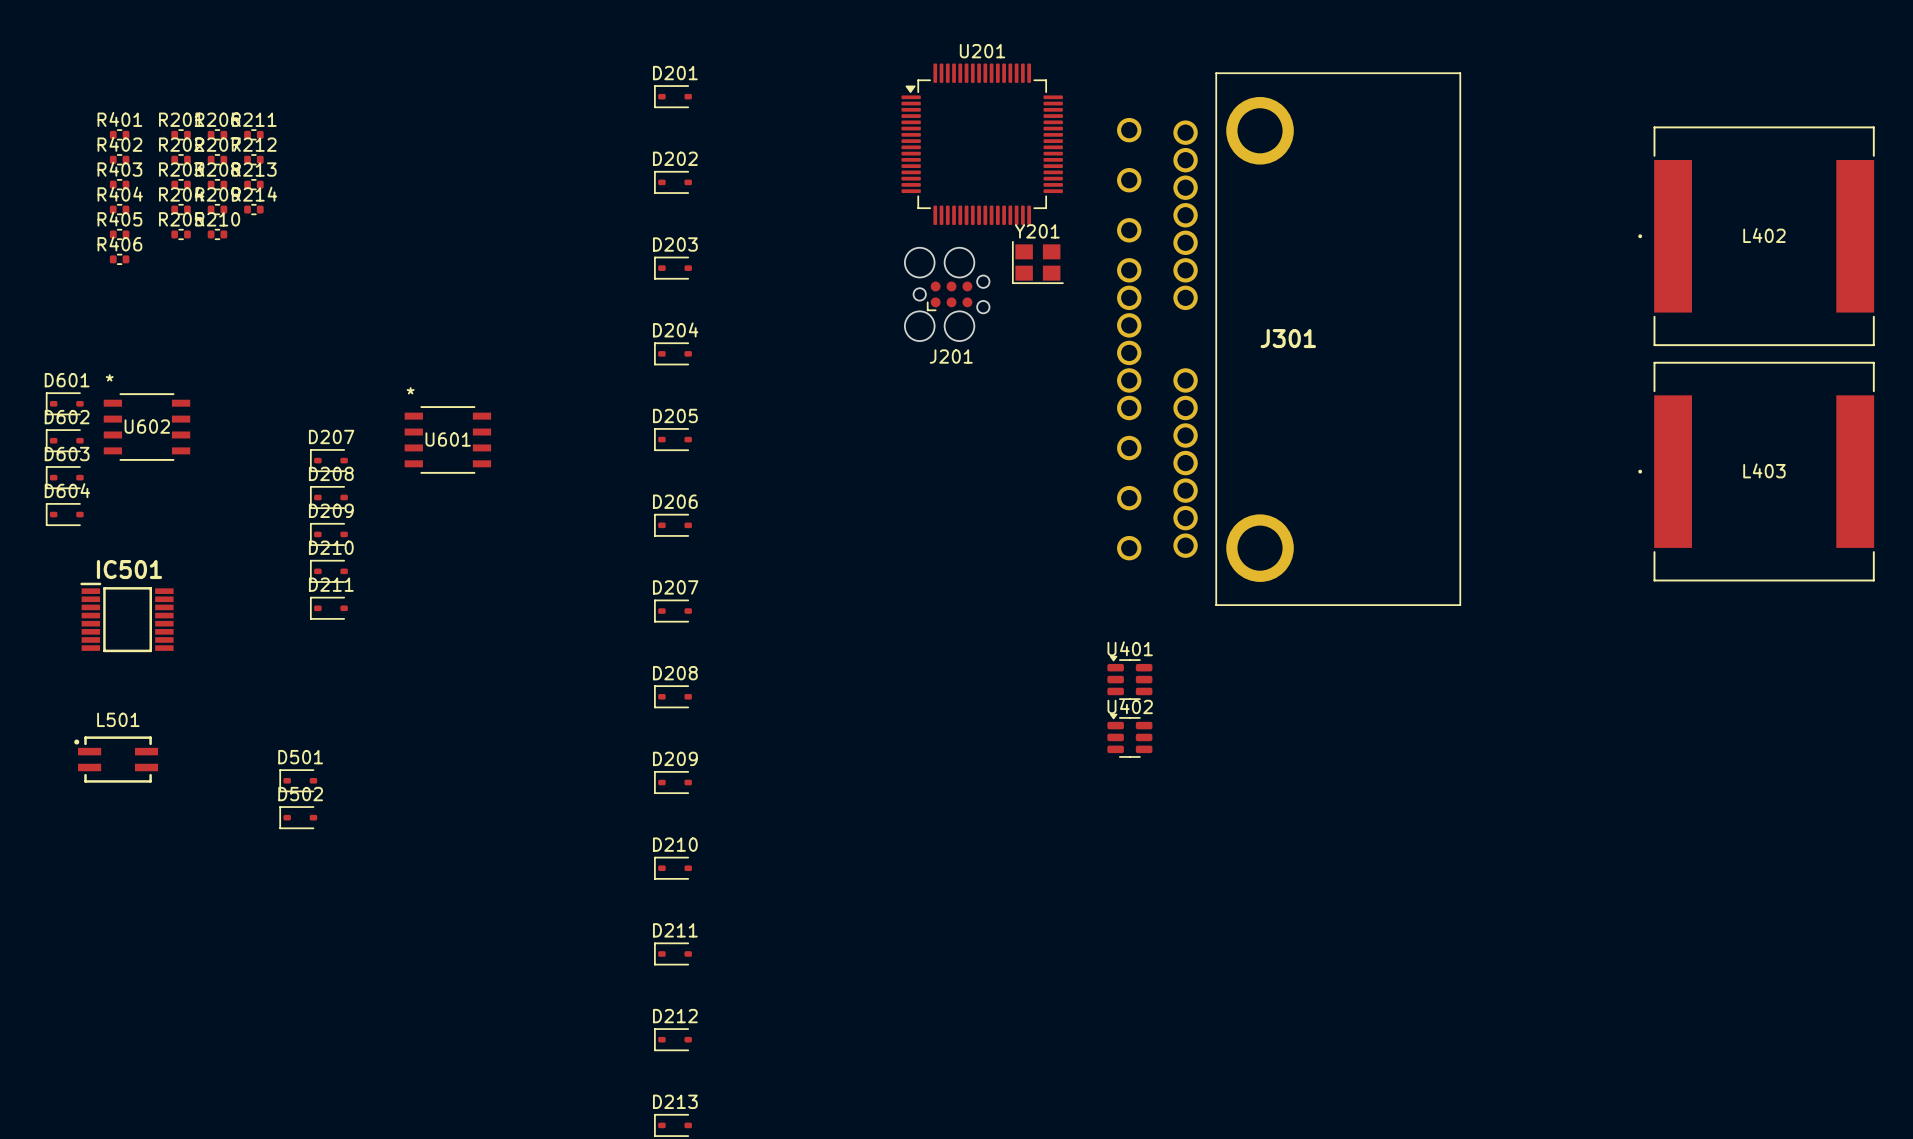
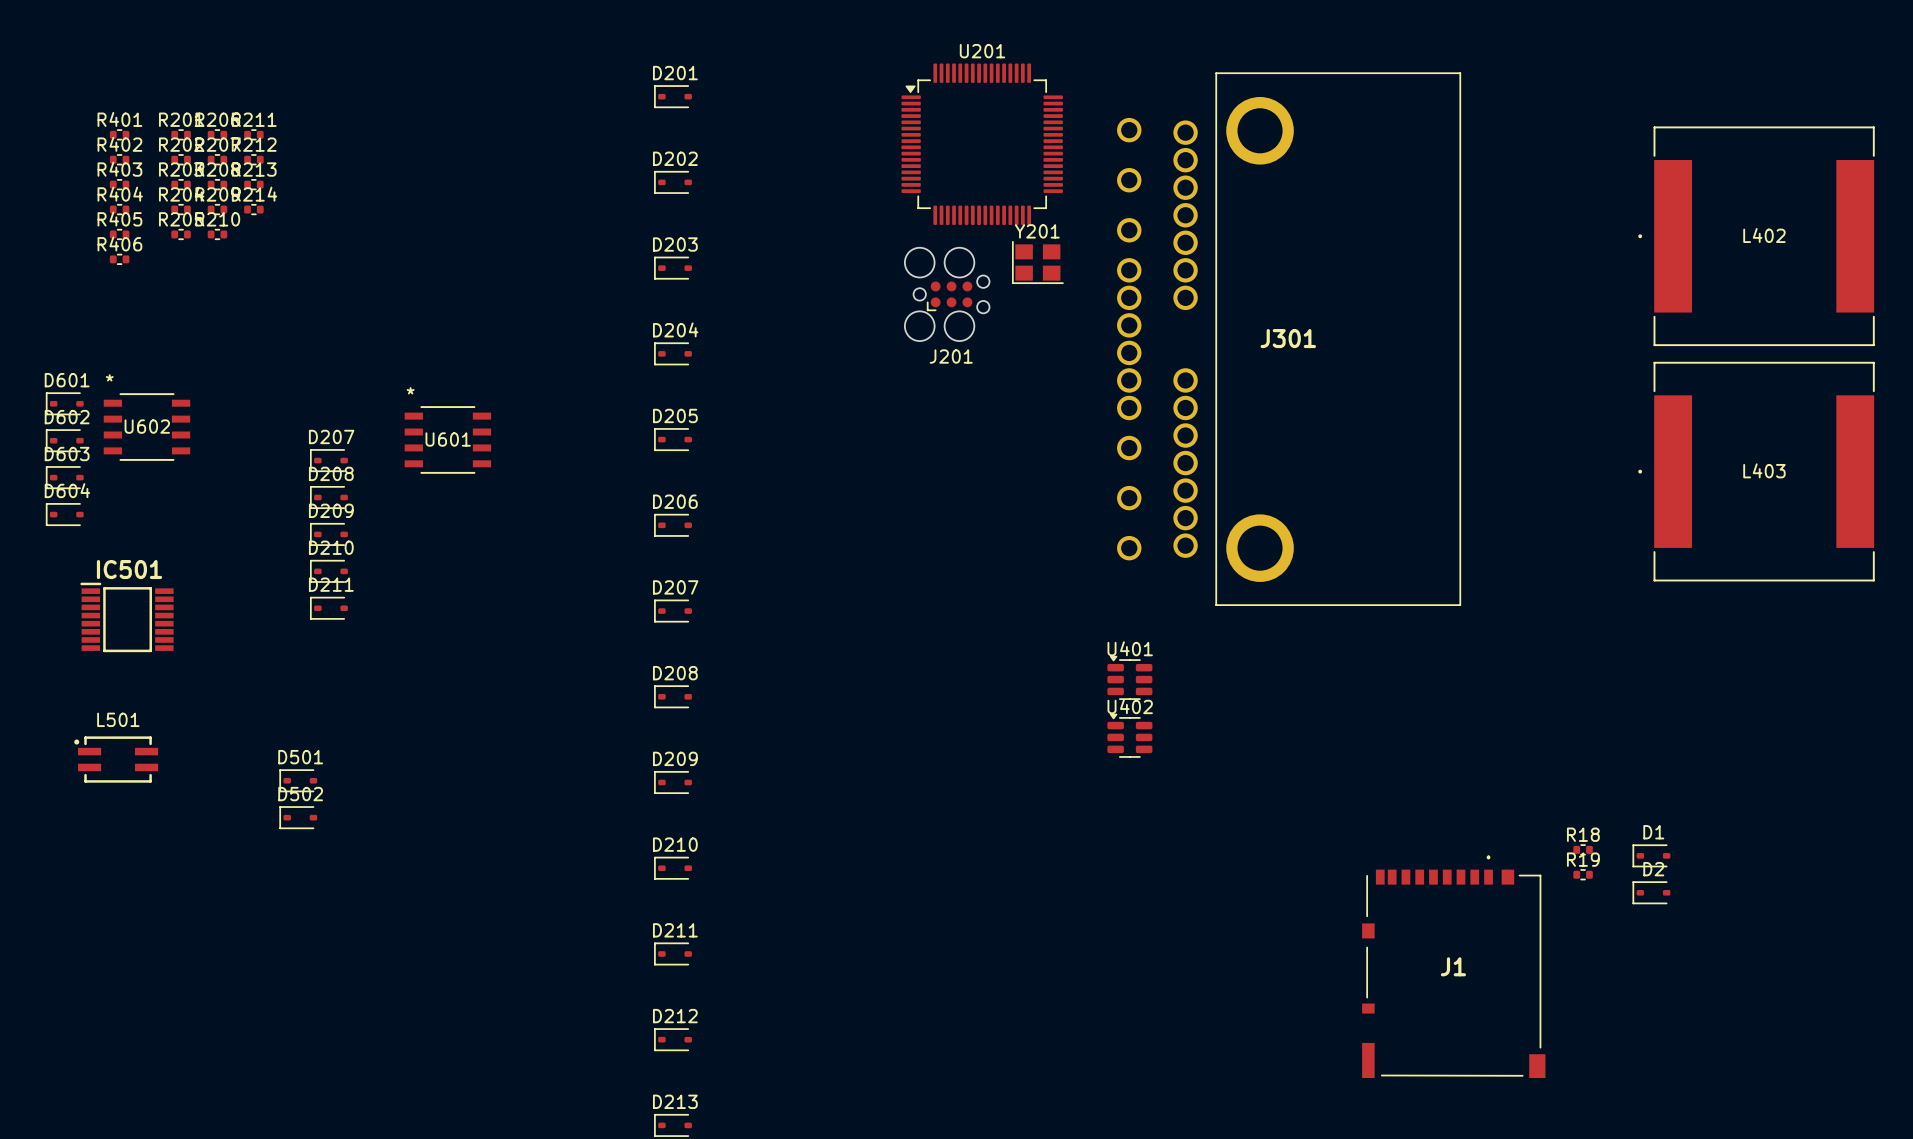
R18: none -> (1583, 849)
D1: none -> (1651, 855)
R19: none -> (1583, 874)
D2: none -> (1651, 892)
J1: none -> (1453, 966)

